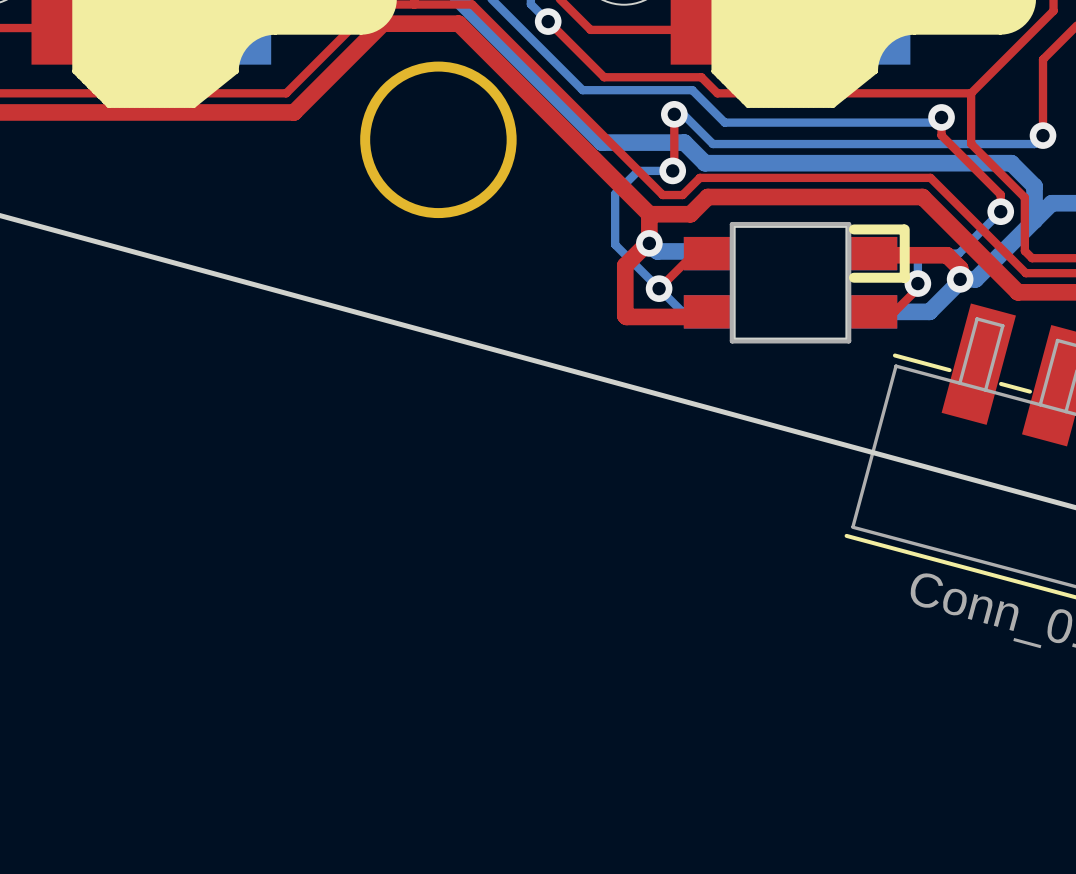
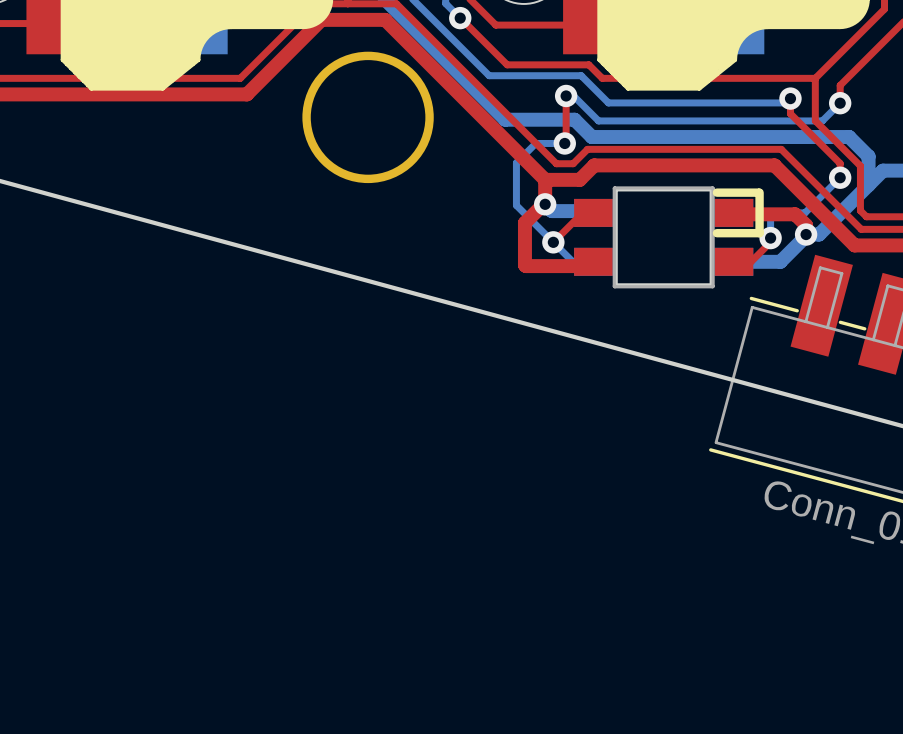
top track: (1043, 59) (1043, 135) -> (875, 49) (840, 85) (840, 103)
bottom track: (1043, 135) (1034, 144) (979, 144) -> (840, 103) (822, 120)
via position: (1043, 135) -> (840, 103)

